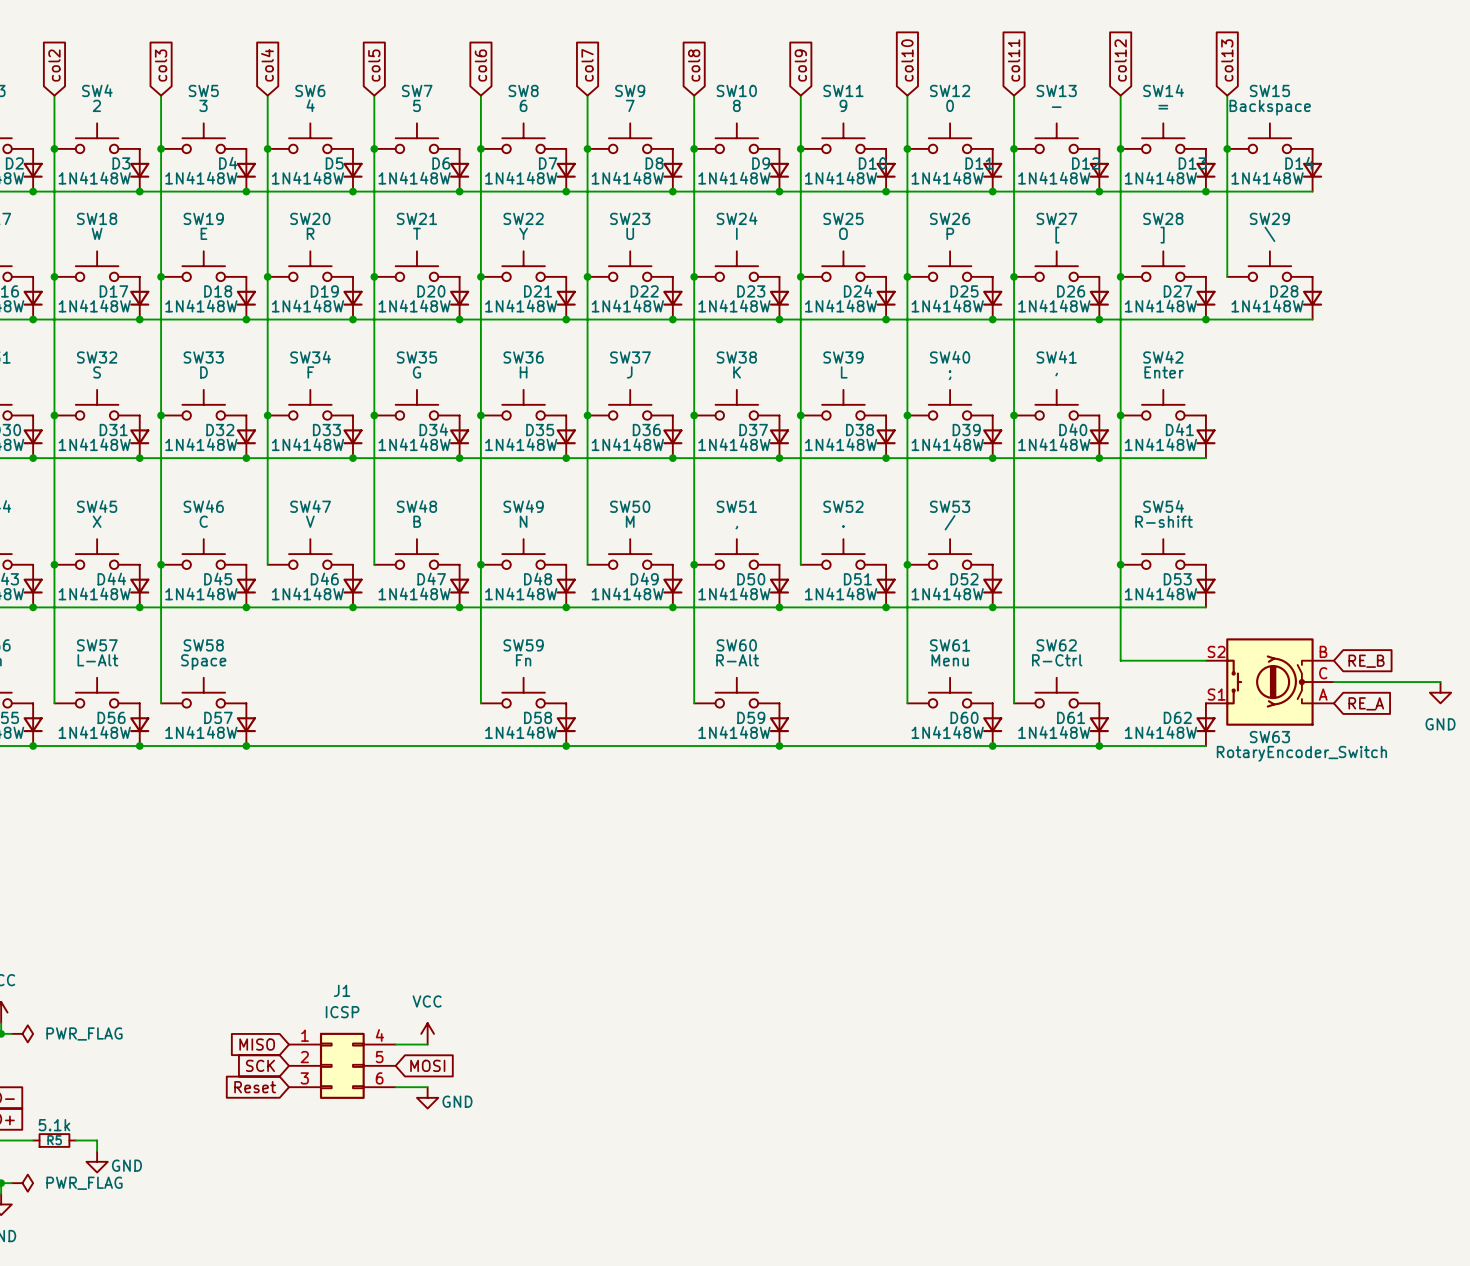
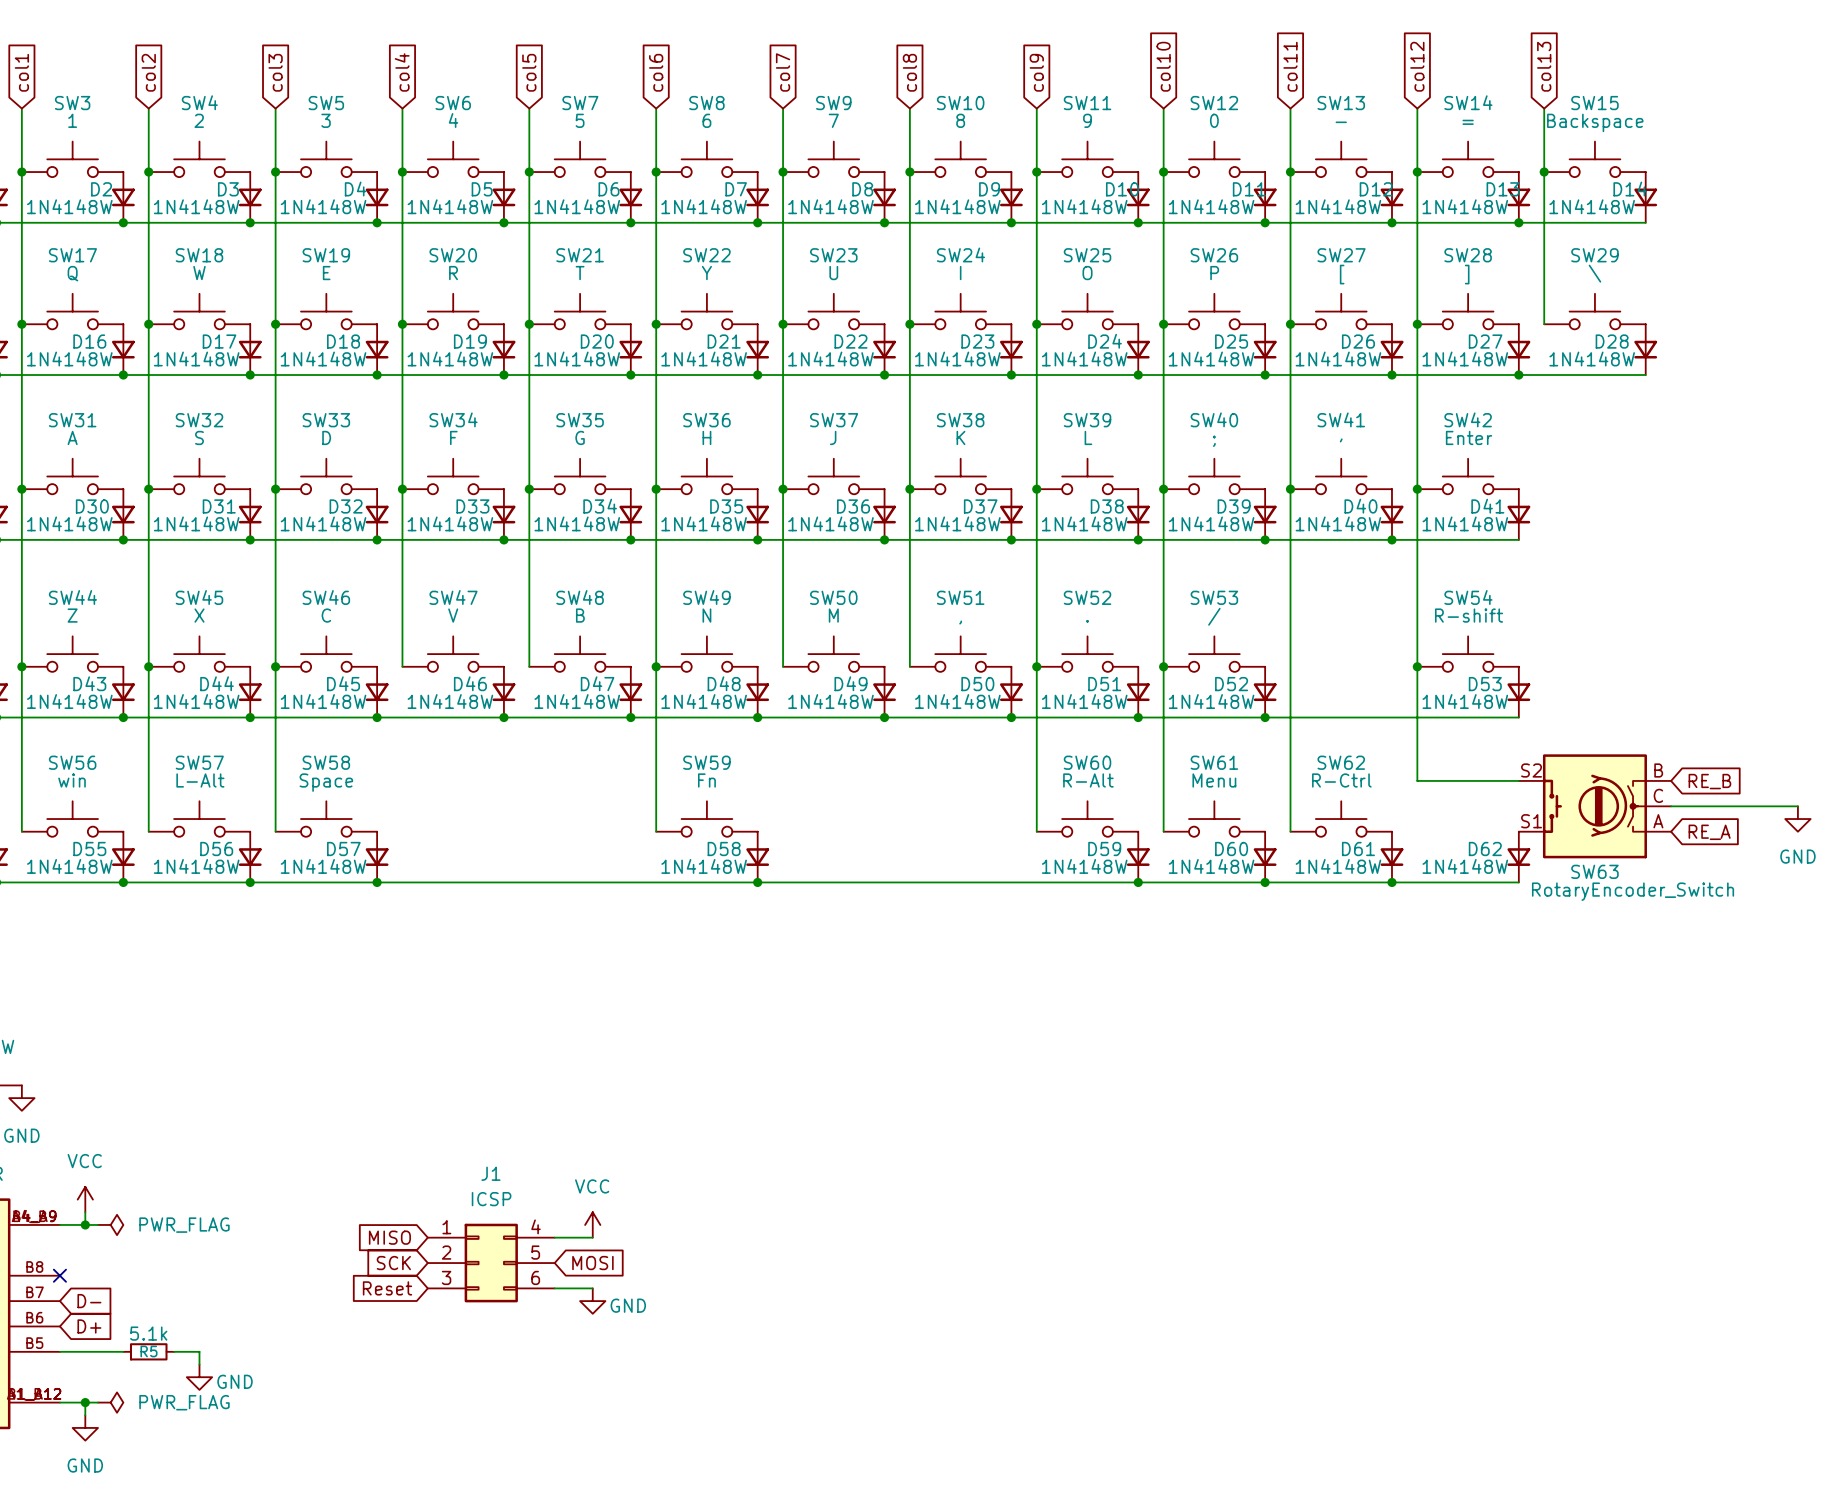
wire: (694, 564) (694, 703) -> (1036, 666) (1036, 831)
junction: (694, 564) -> none
junction: none -> (1036, 666)
SW60 position: (736, 692) -> (1087, 819)
D59 position: (779, 724) -> (1138, 857)
junction: (779, 746) -> none
junction: none -> (1138, 882)

